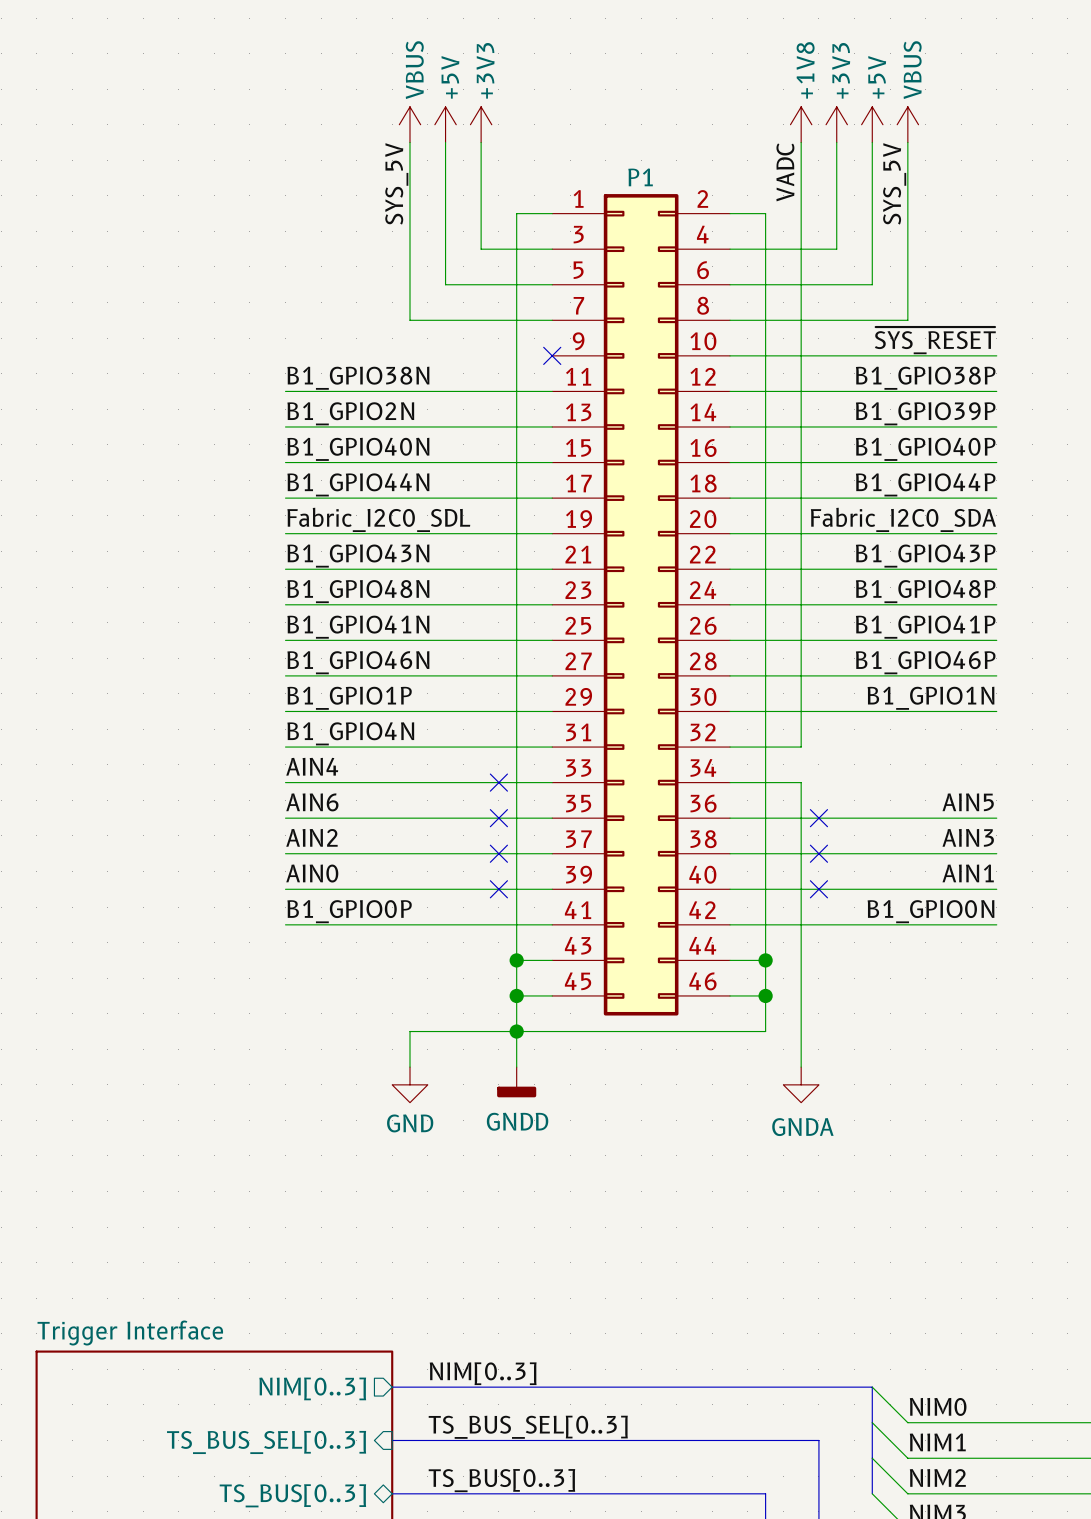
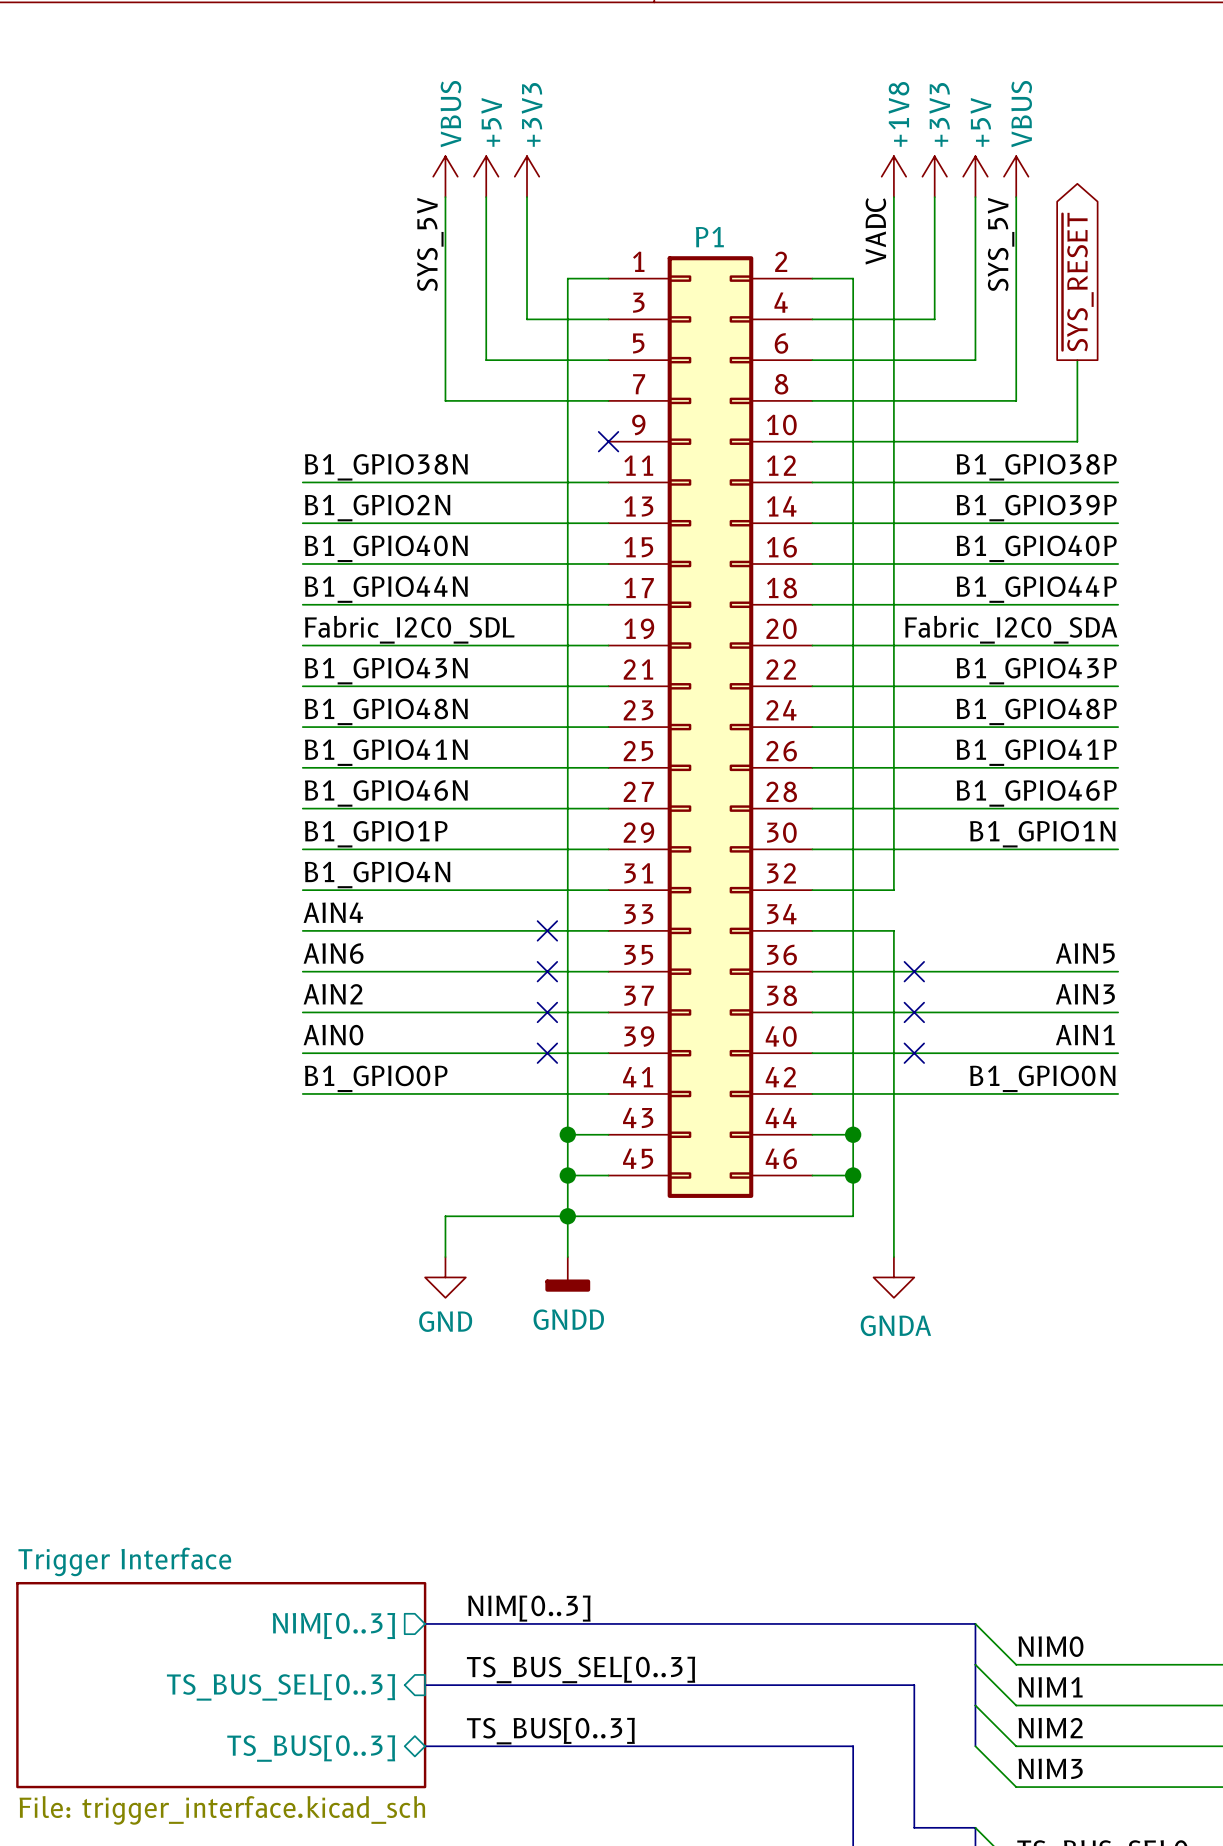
global label: none -> ~{SYS_RESET} (1078, 282)
label: ~{SYS_RESET} (935, 340) -> none
wire: (961, 355) (996, 355) -> (1077, 441) (1077, 360)

